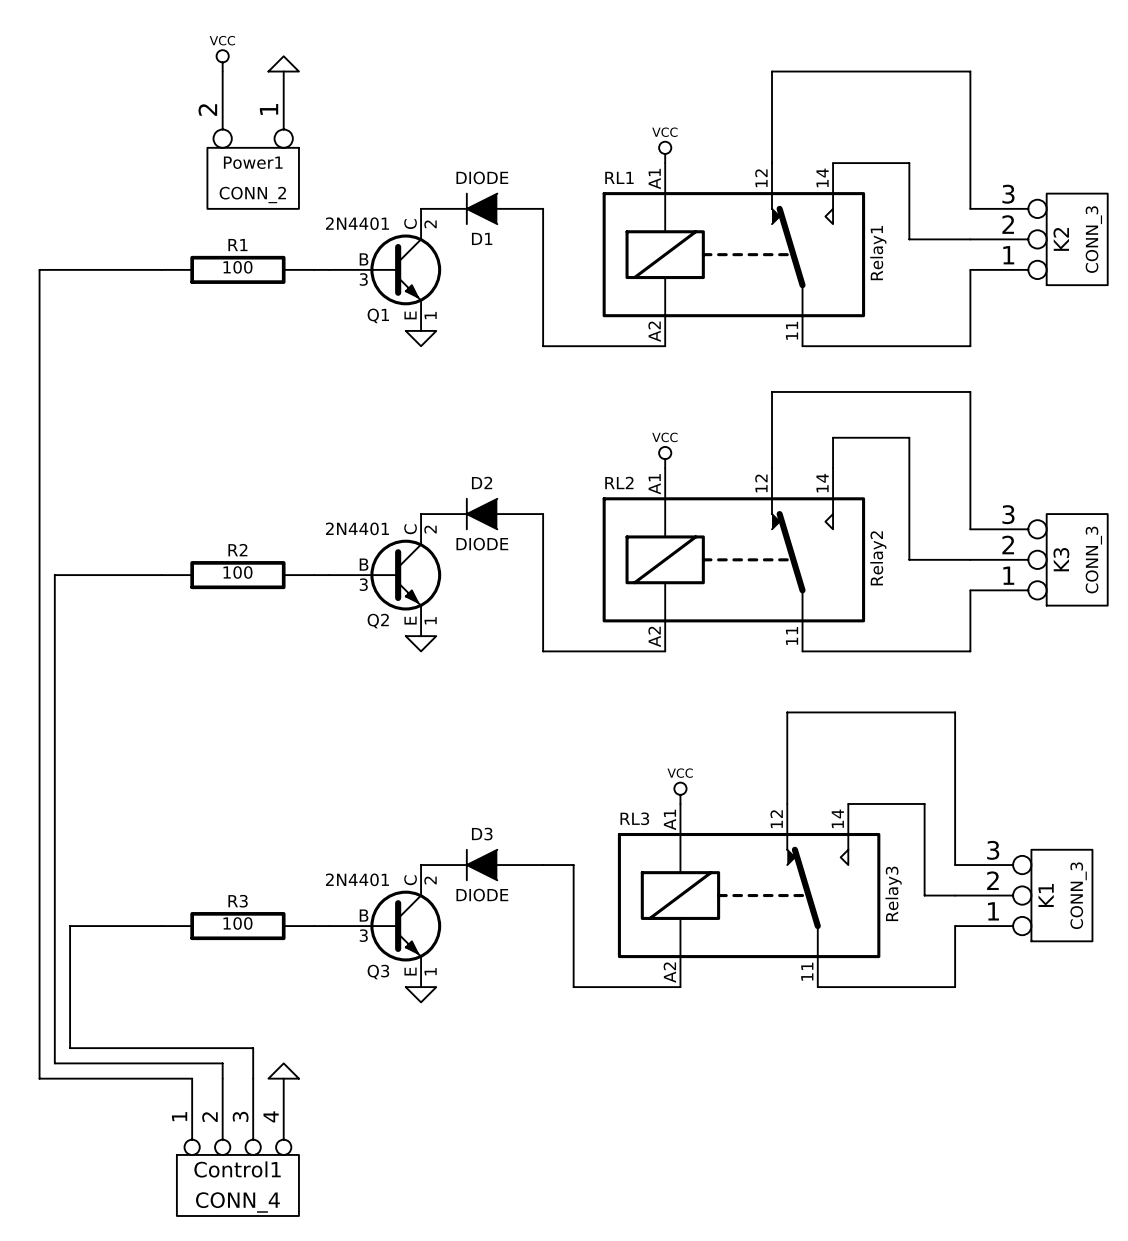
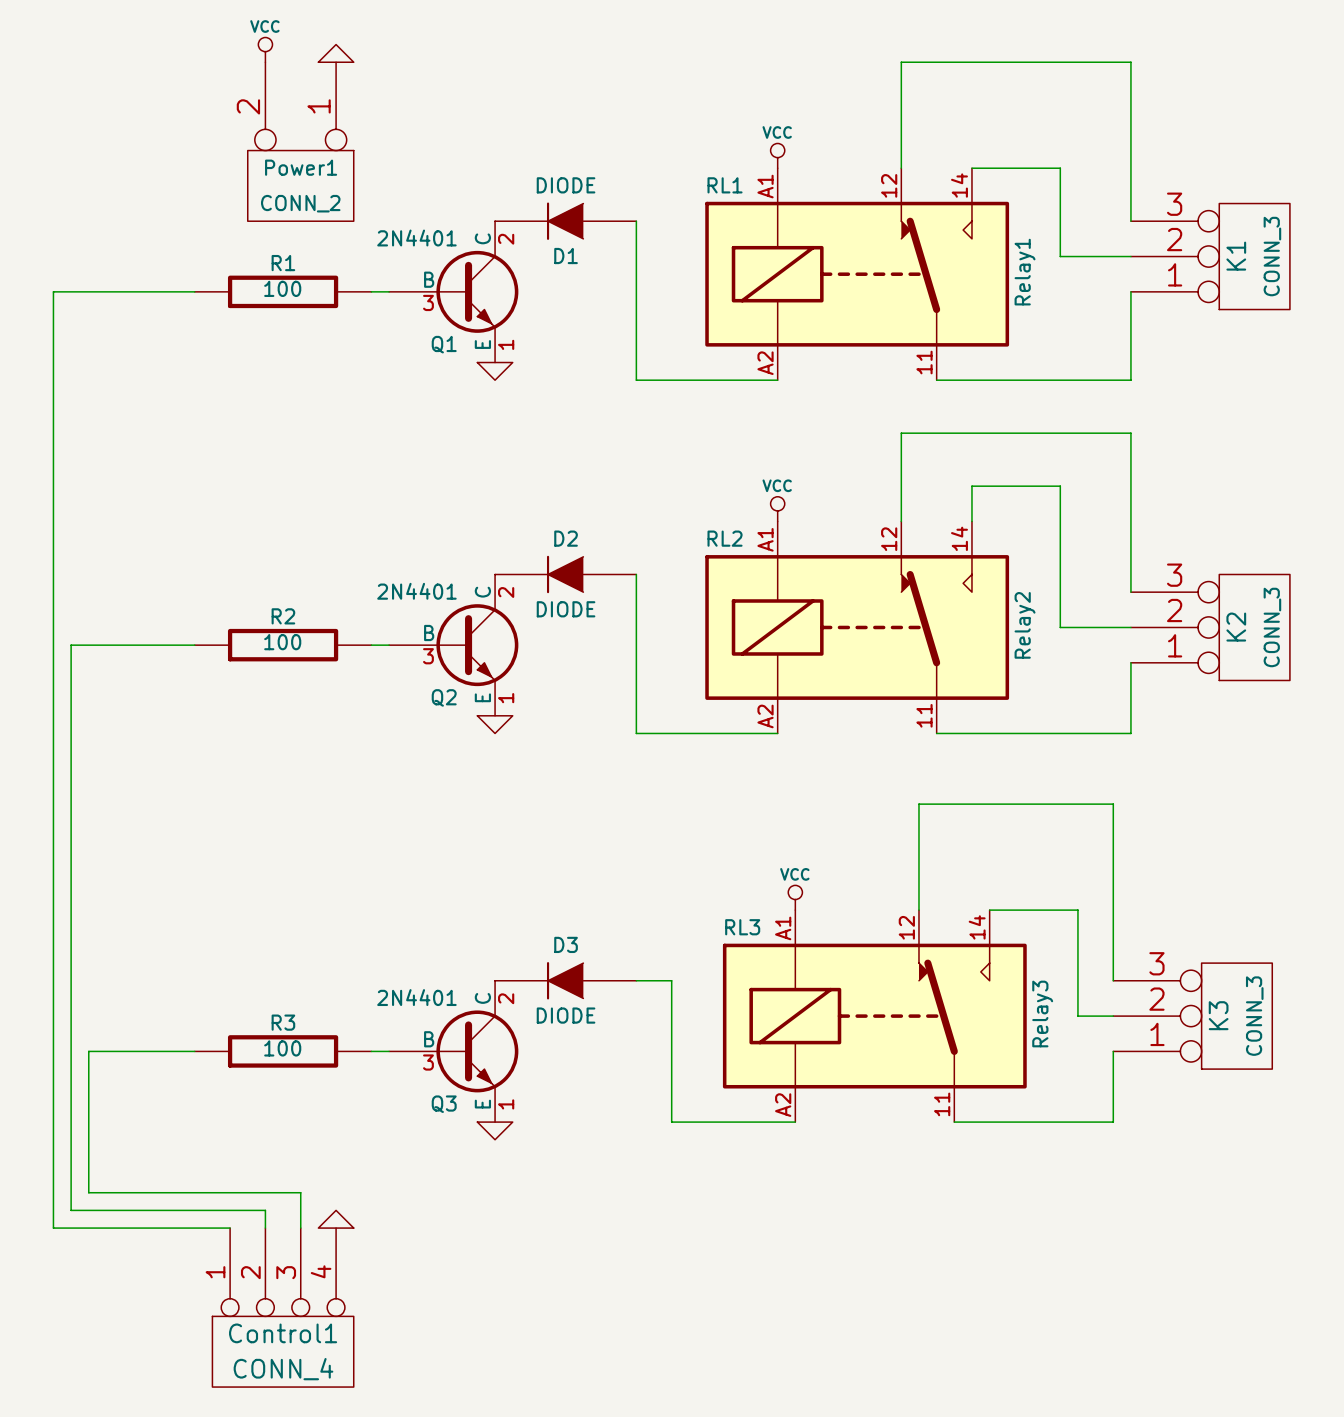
K2 name: K2 (1061, 239) -> K1 (1236, 256)
K3 name: K3 (1061, 559) -> K2 (1236, 627)
K1 name: K1 (1046, 895) -> K3 (1218, 1015)

